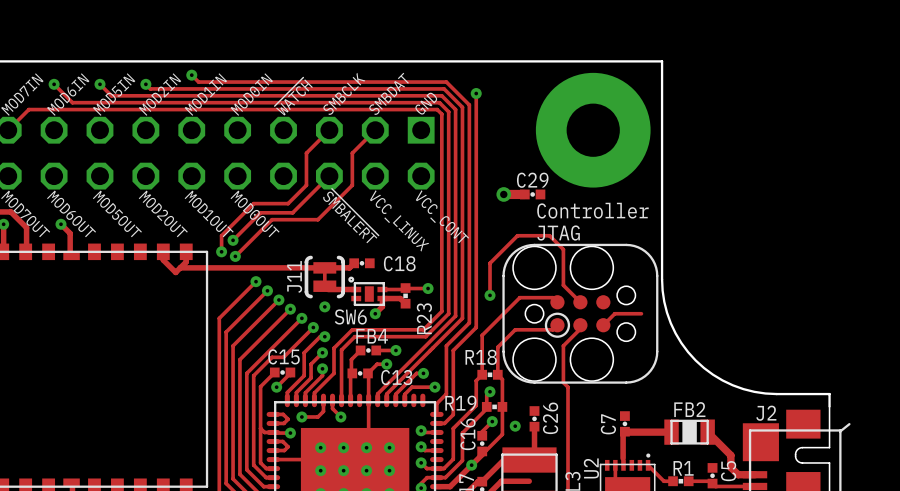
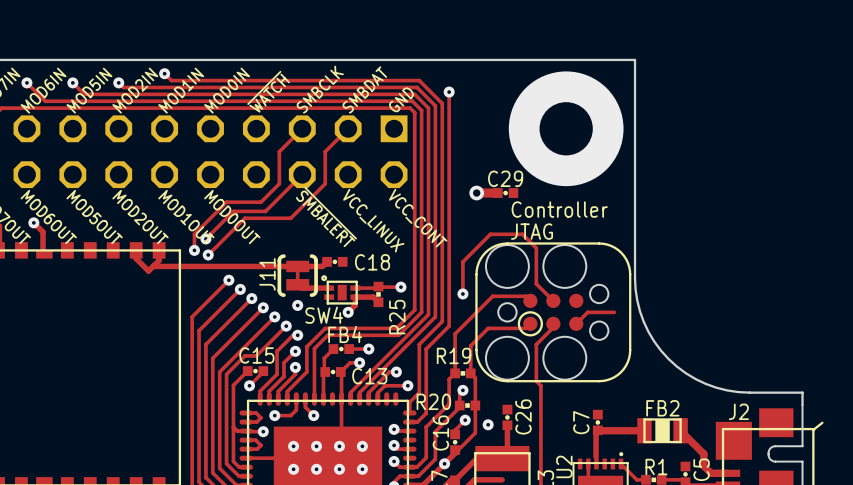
SW6 name: SW6 (350, 316) -> SW4 (324, 315)
R23 name: R23 (424, 318) -> R25 (397, 317)
R18 name: R18 (481, 357) -> R19 (454, 355)
R19 name: R19 (460, 403) -> R20 (433, 401)

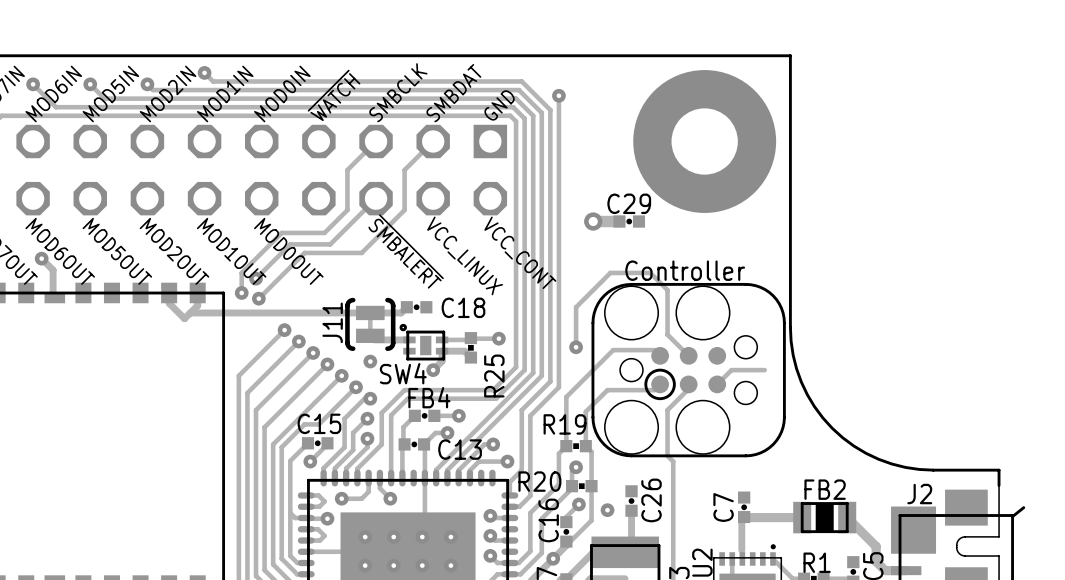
text: Controller (559, 209) -> none
text: JTAG (532, 231) -> Controller (685, 270)

